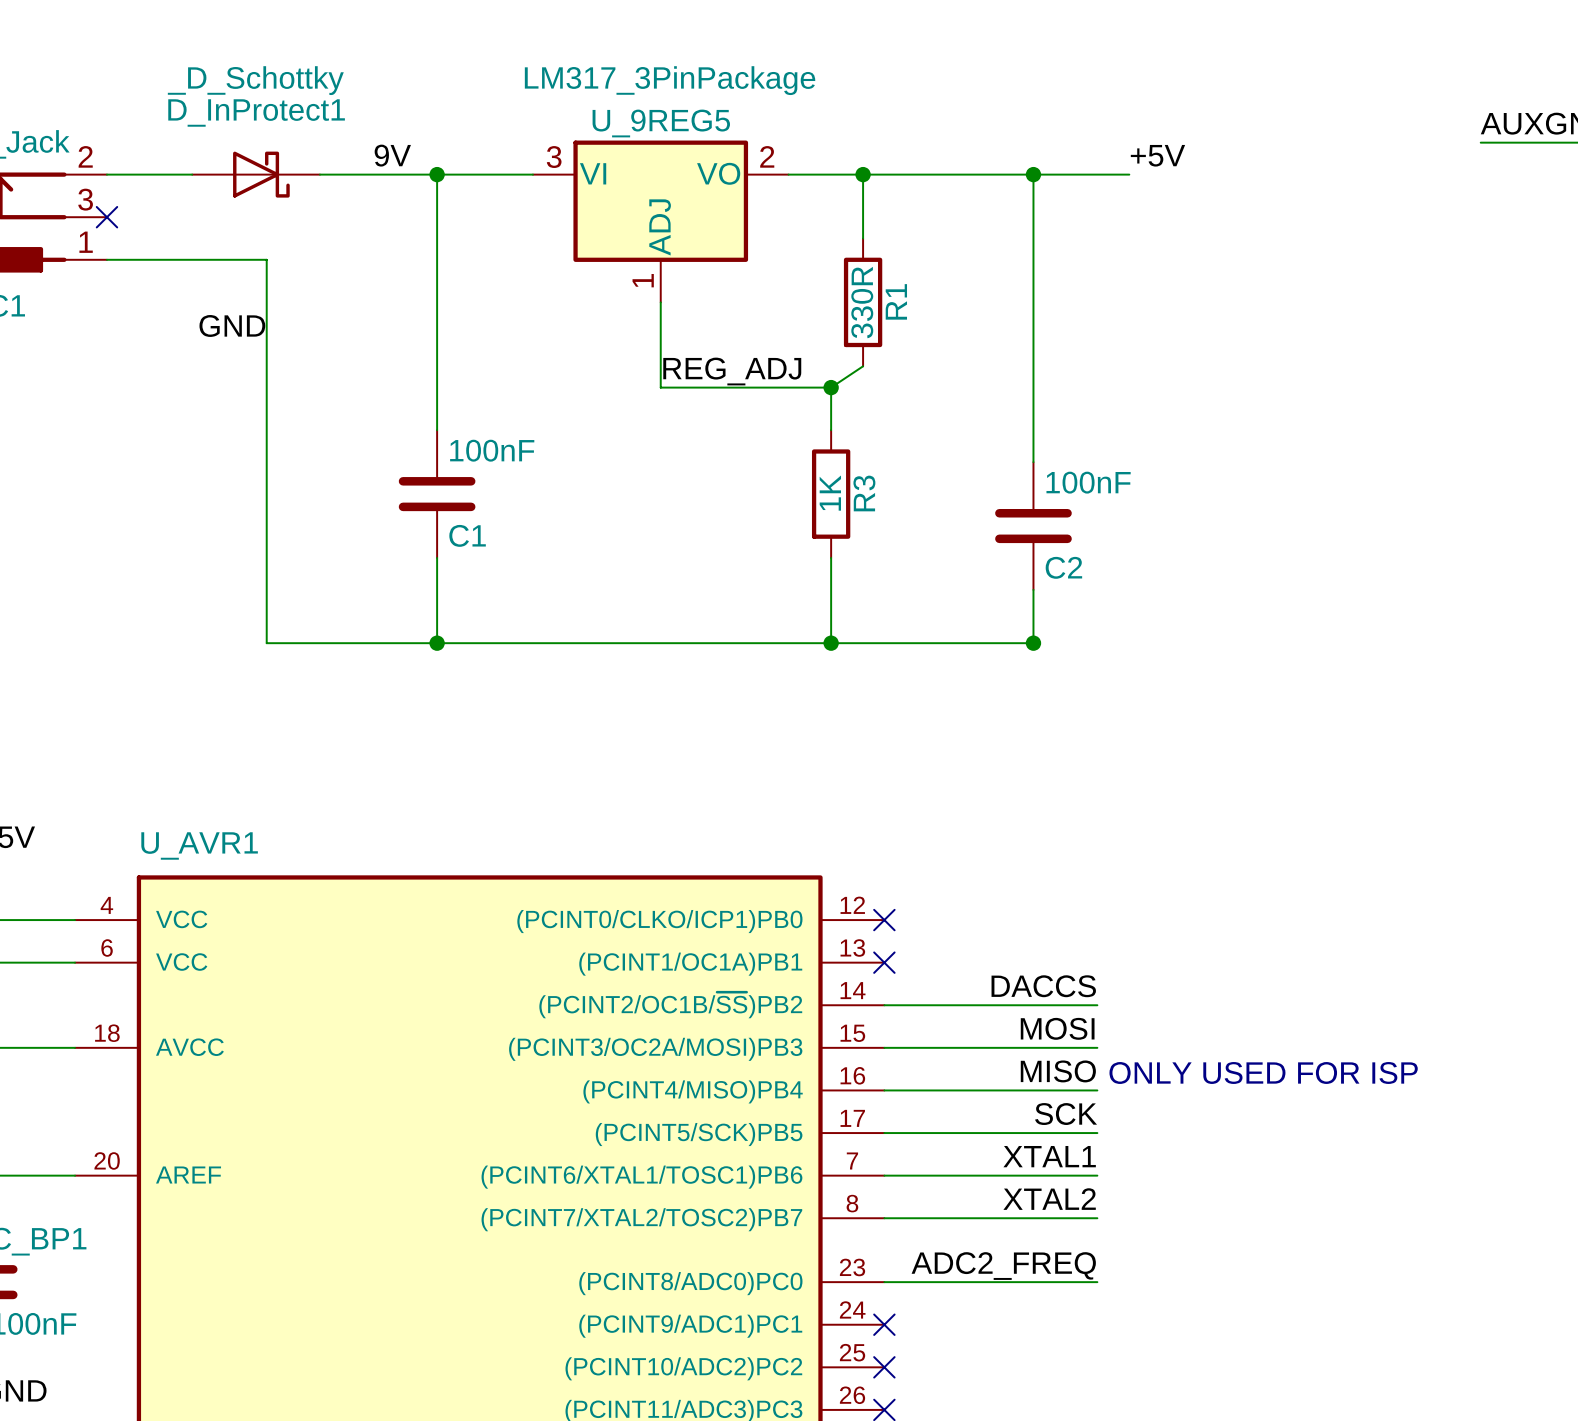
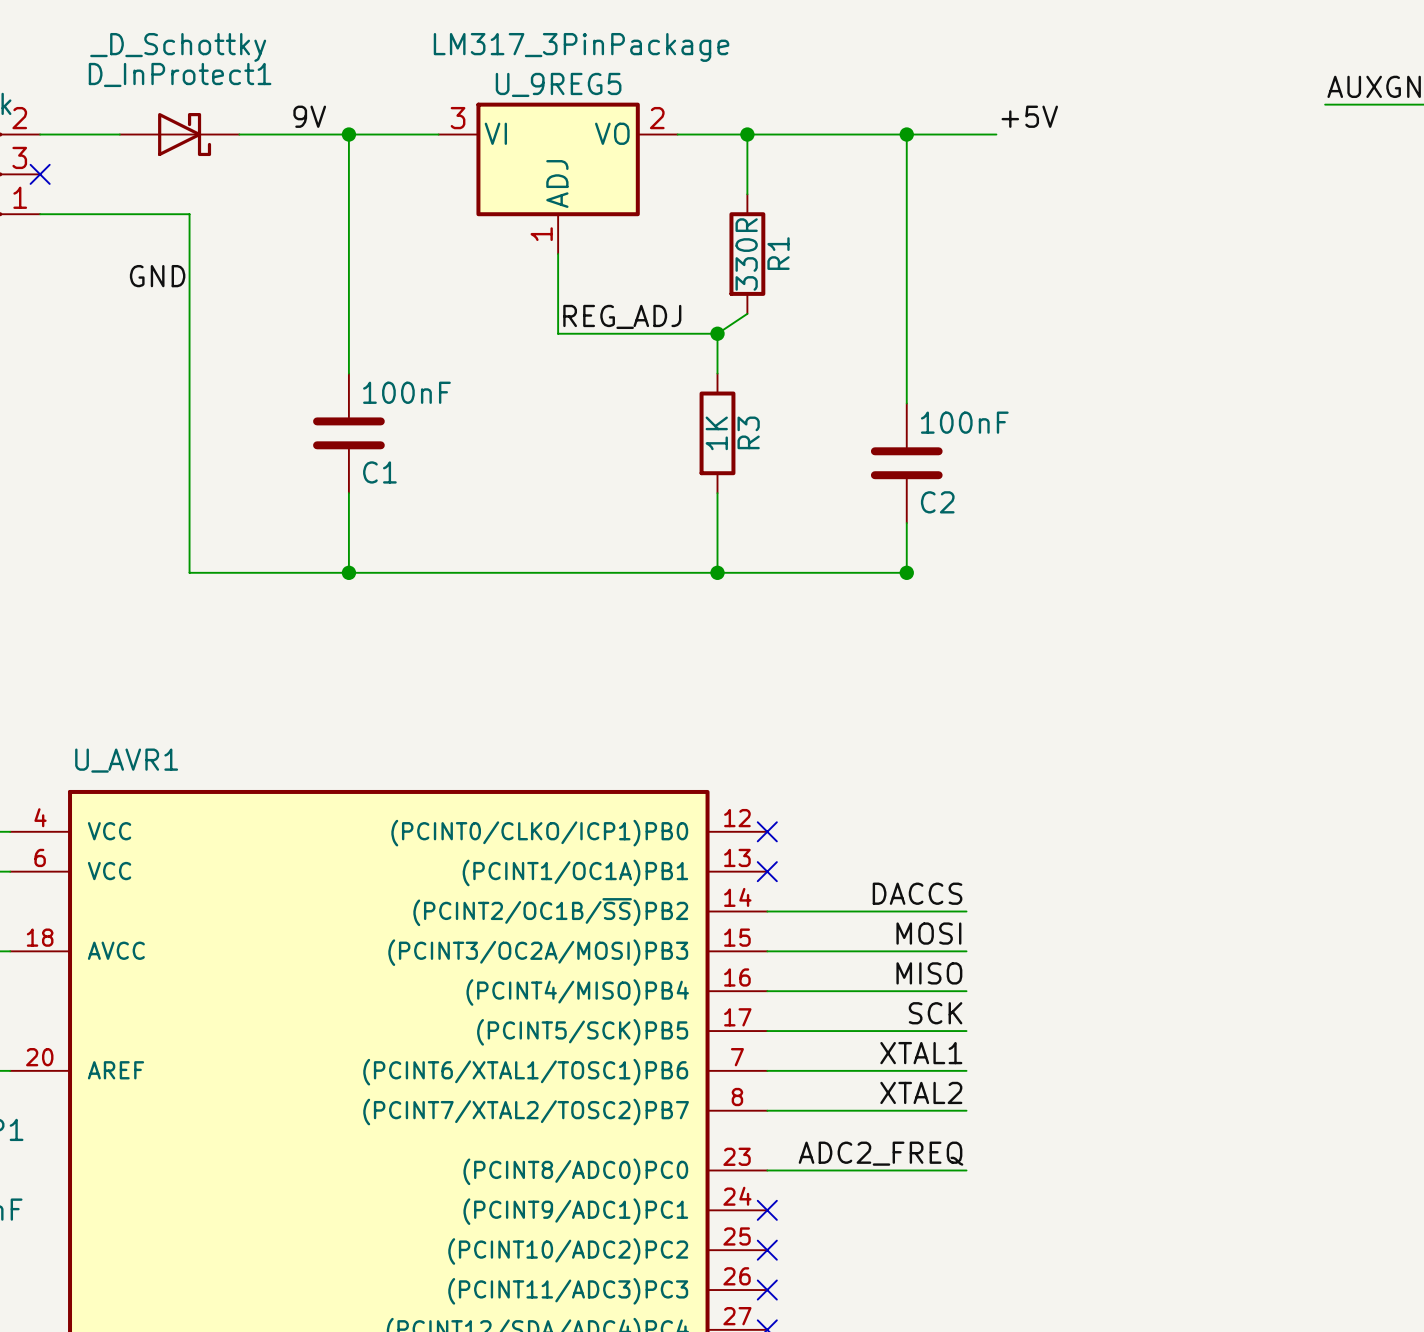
text: ONLY USED FOR ISP (1263, 1072) -> none

